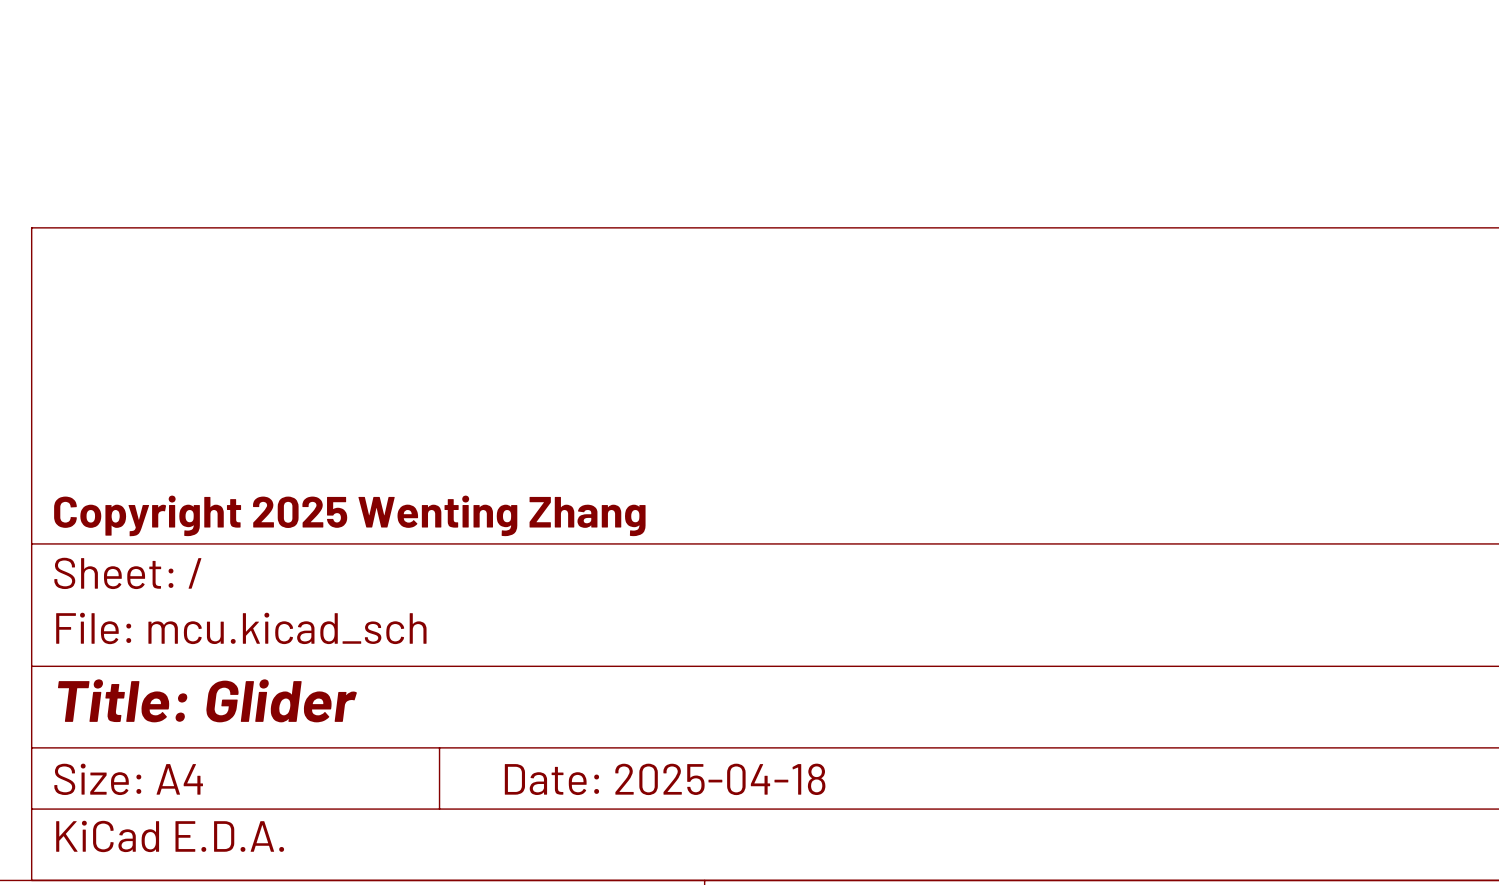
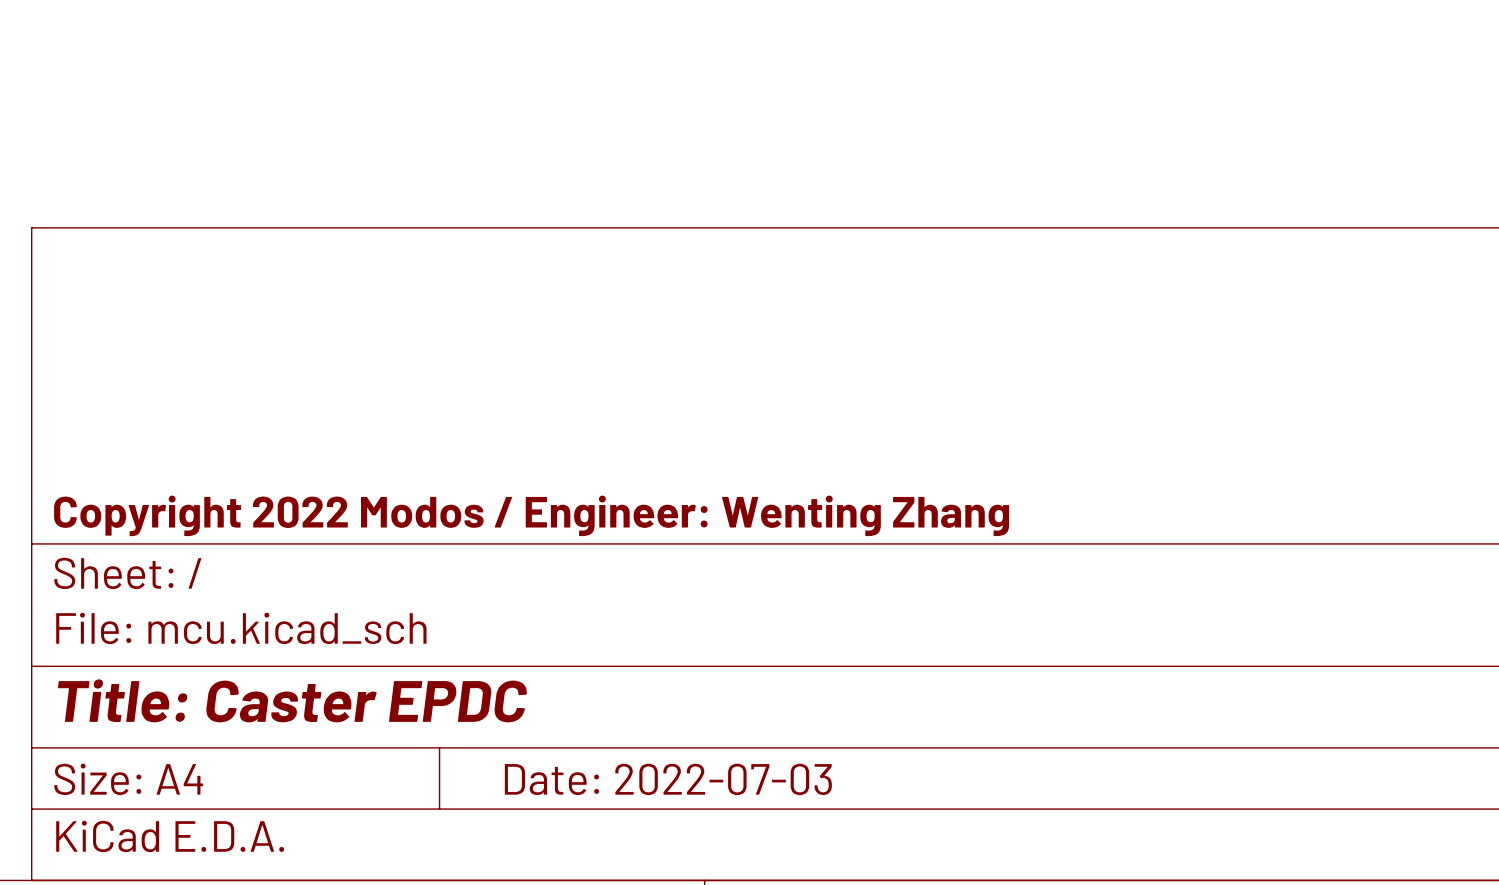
title block: Copyright 2025 Wenting Zhang (349, 515) -> Copyright 2022 Modos / Engineer: Wenting Zhang (531, 515)
title block: Title: Glider (207, 700) -> Title: Caster EPDC (292, 700)
title block: Date: 2025-04-18 (665, 779) -> Date: 2022-07-03 (668, 779)

